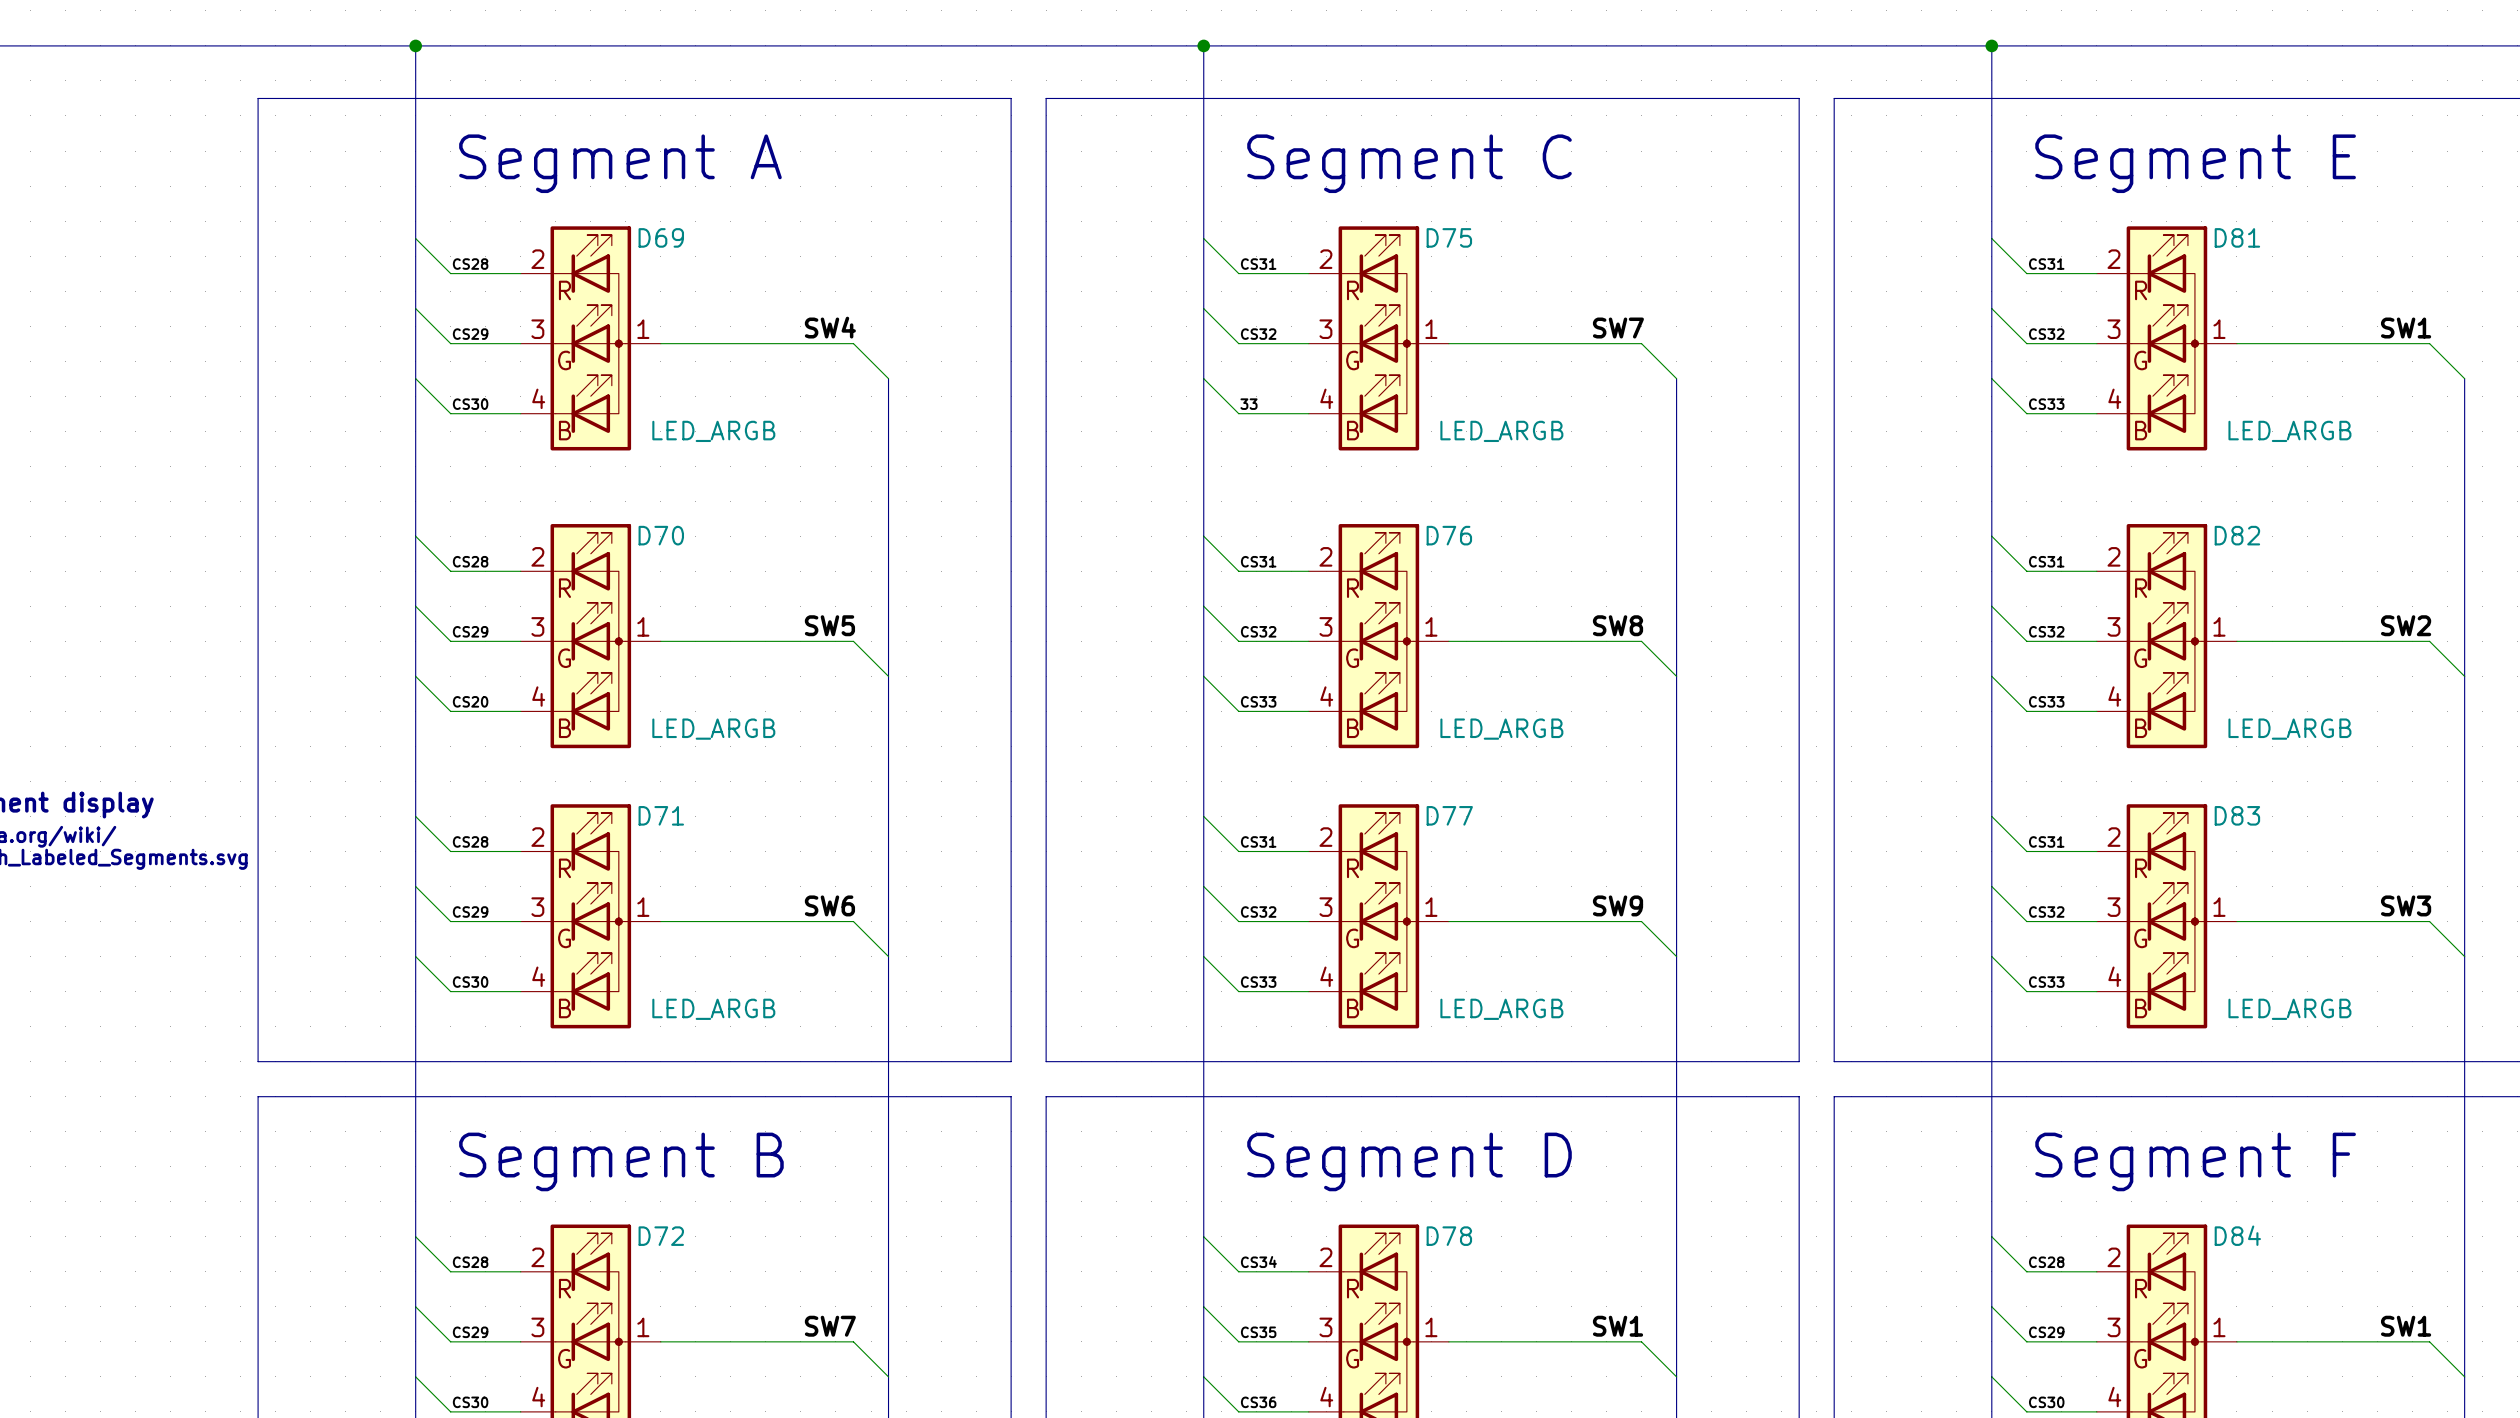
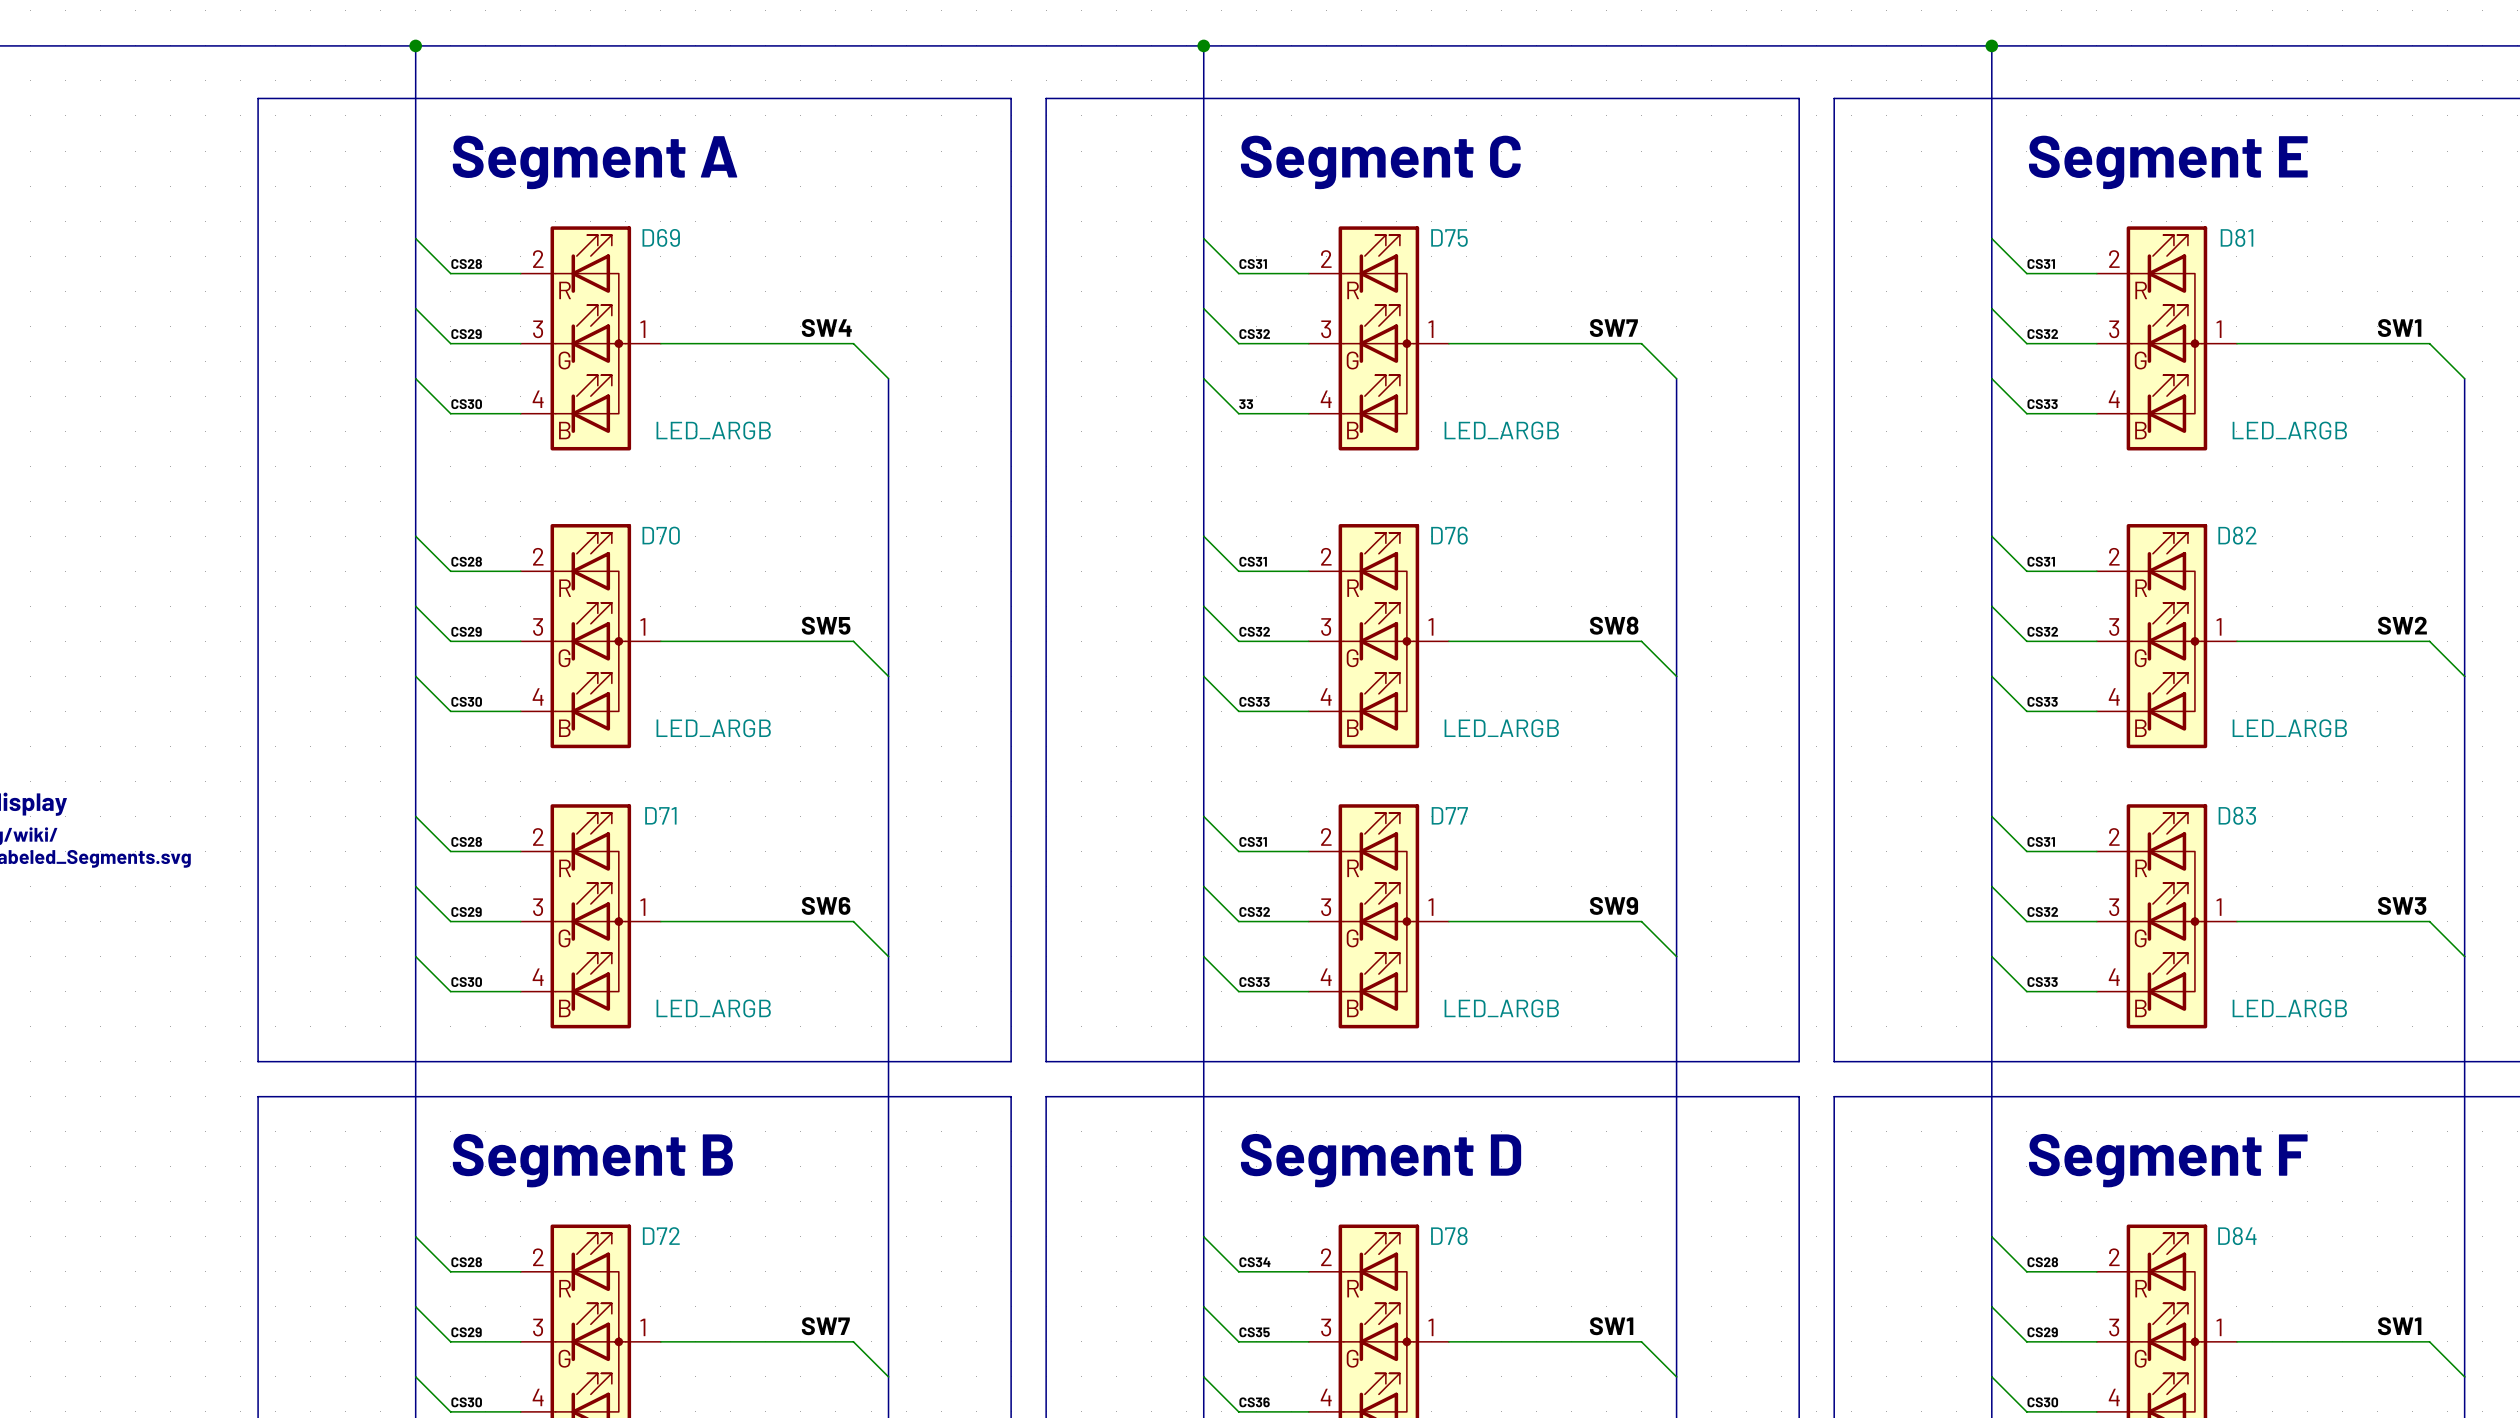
label: CS20 (470, 701) -> CS30 (466, 701)

